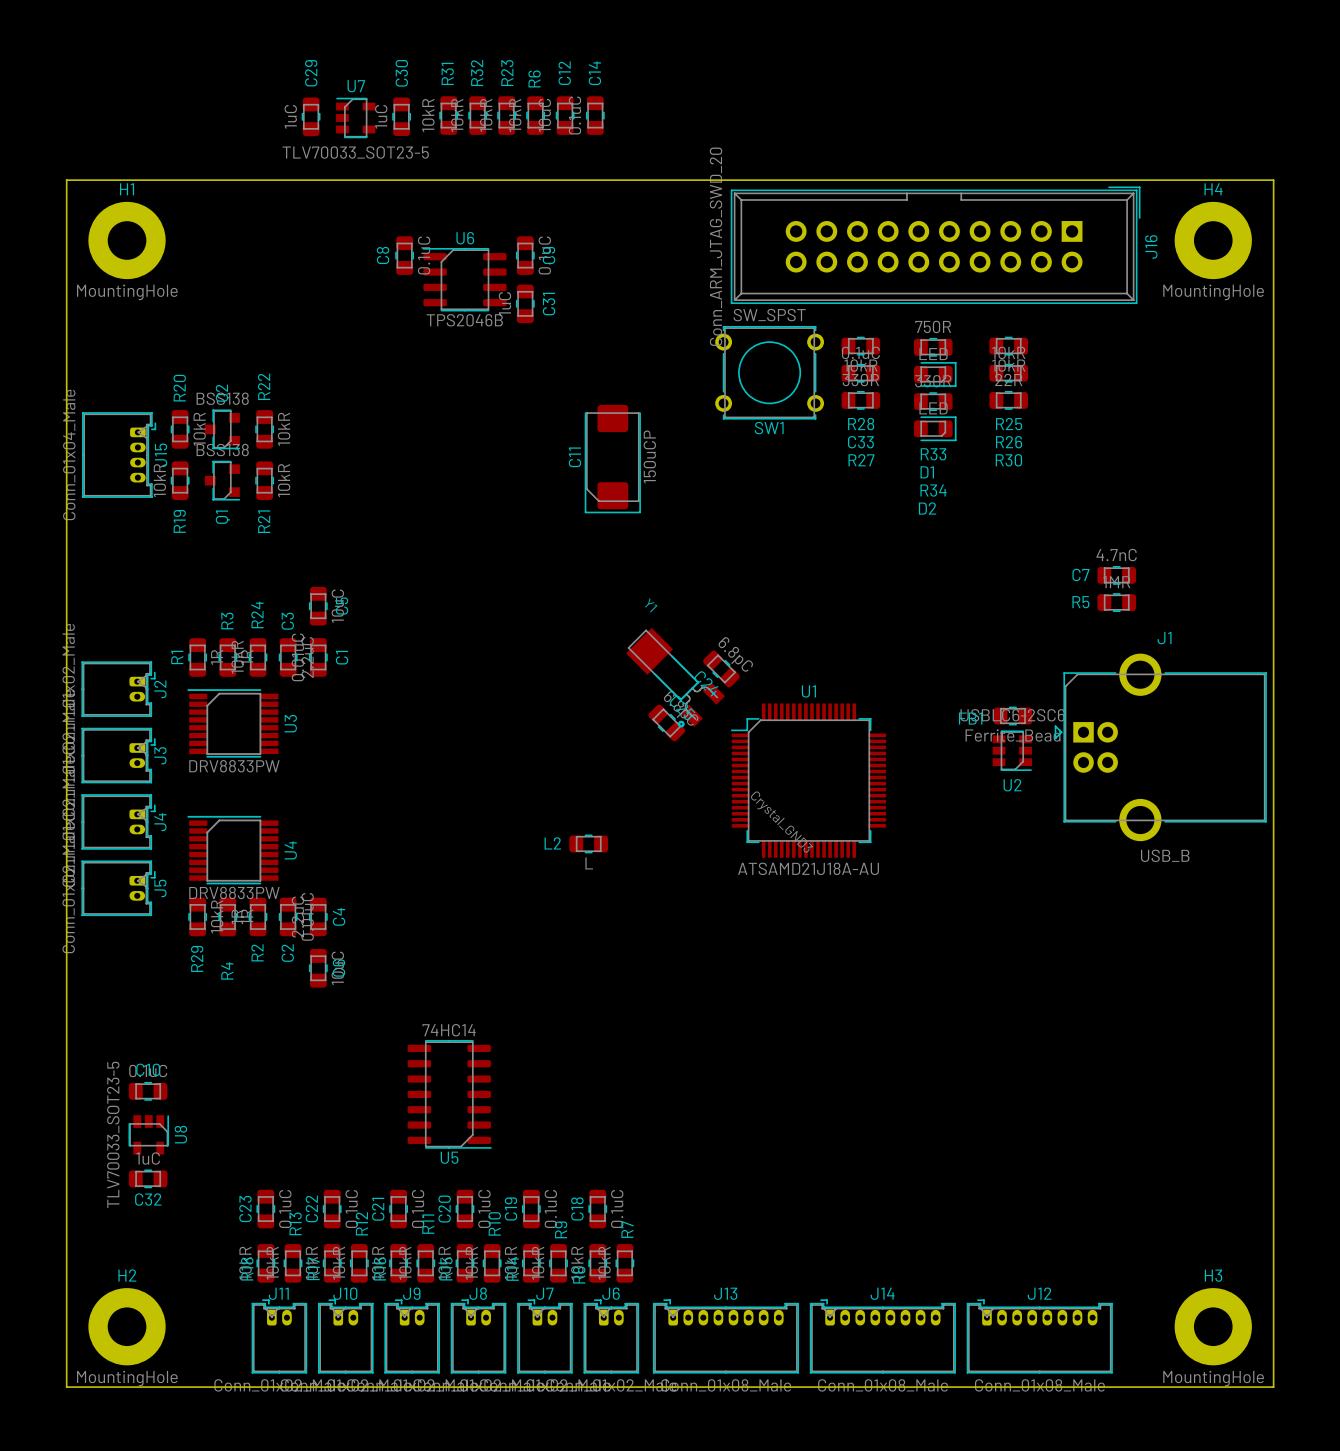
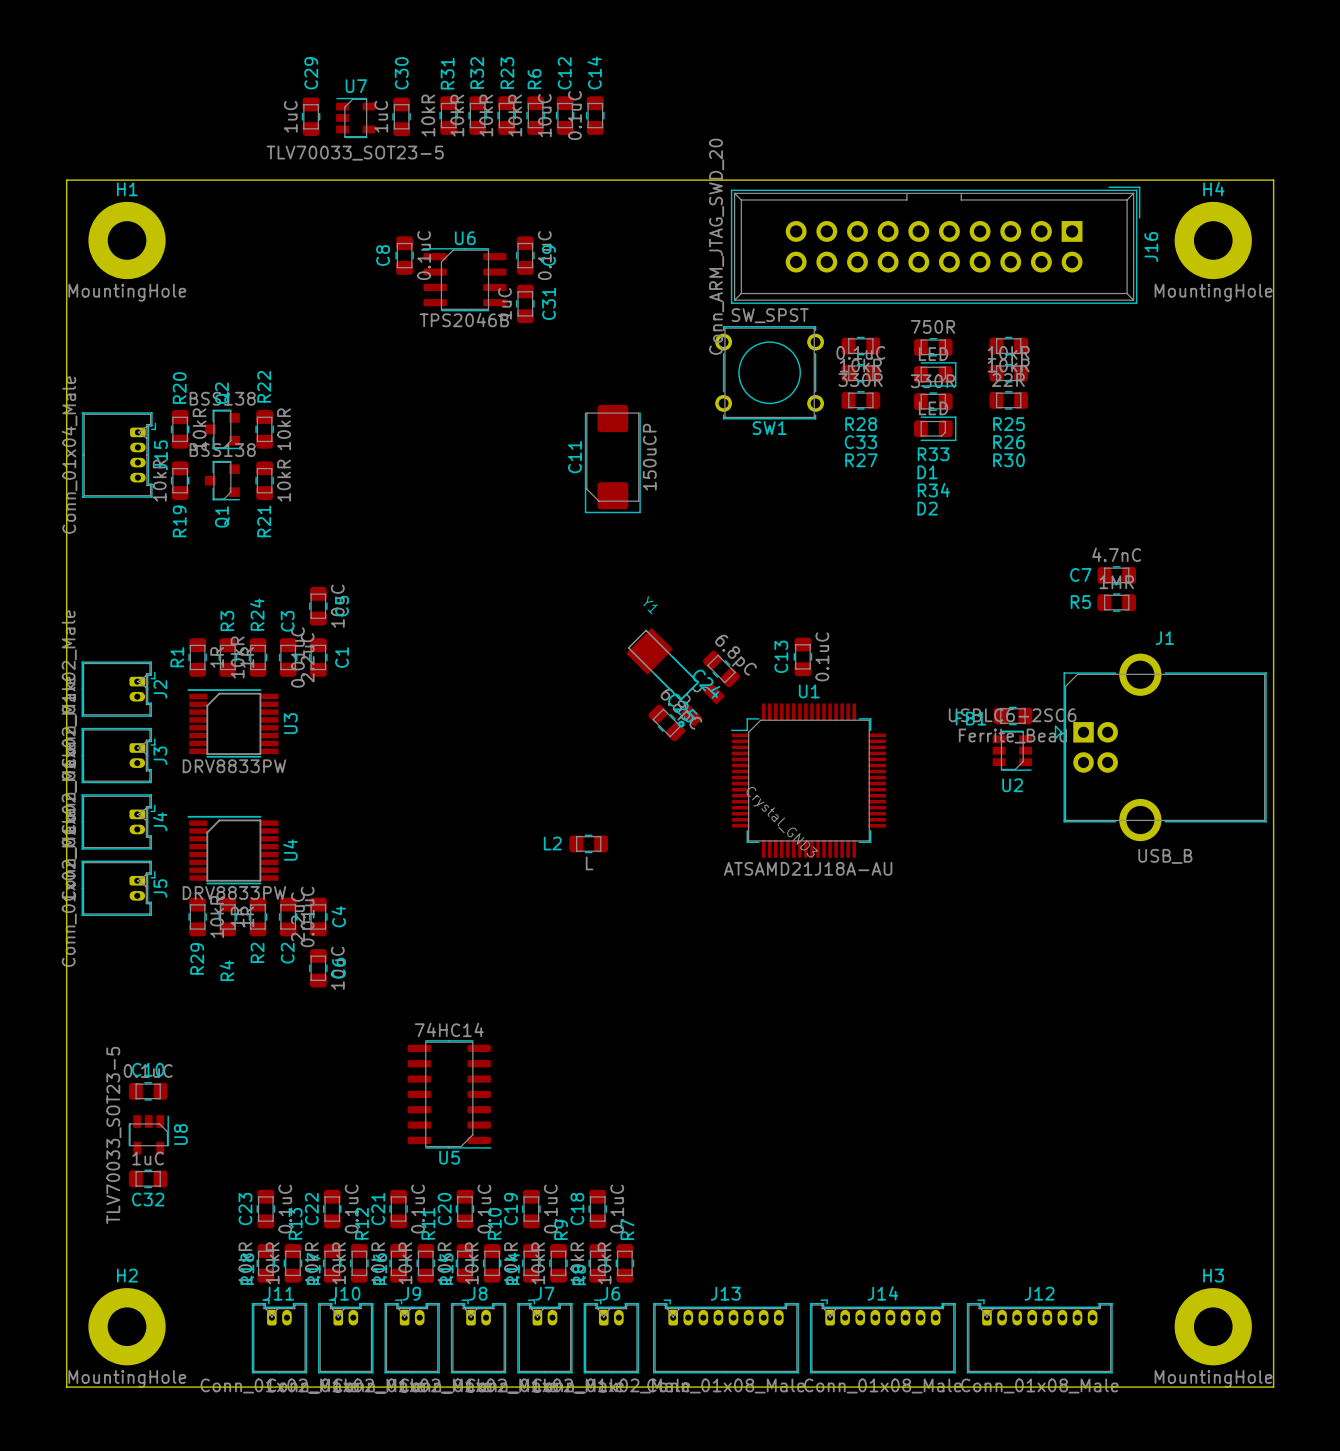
C13: none -> 0.1uC (802, 656)

